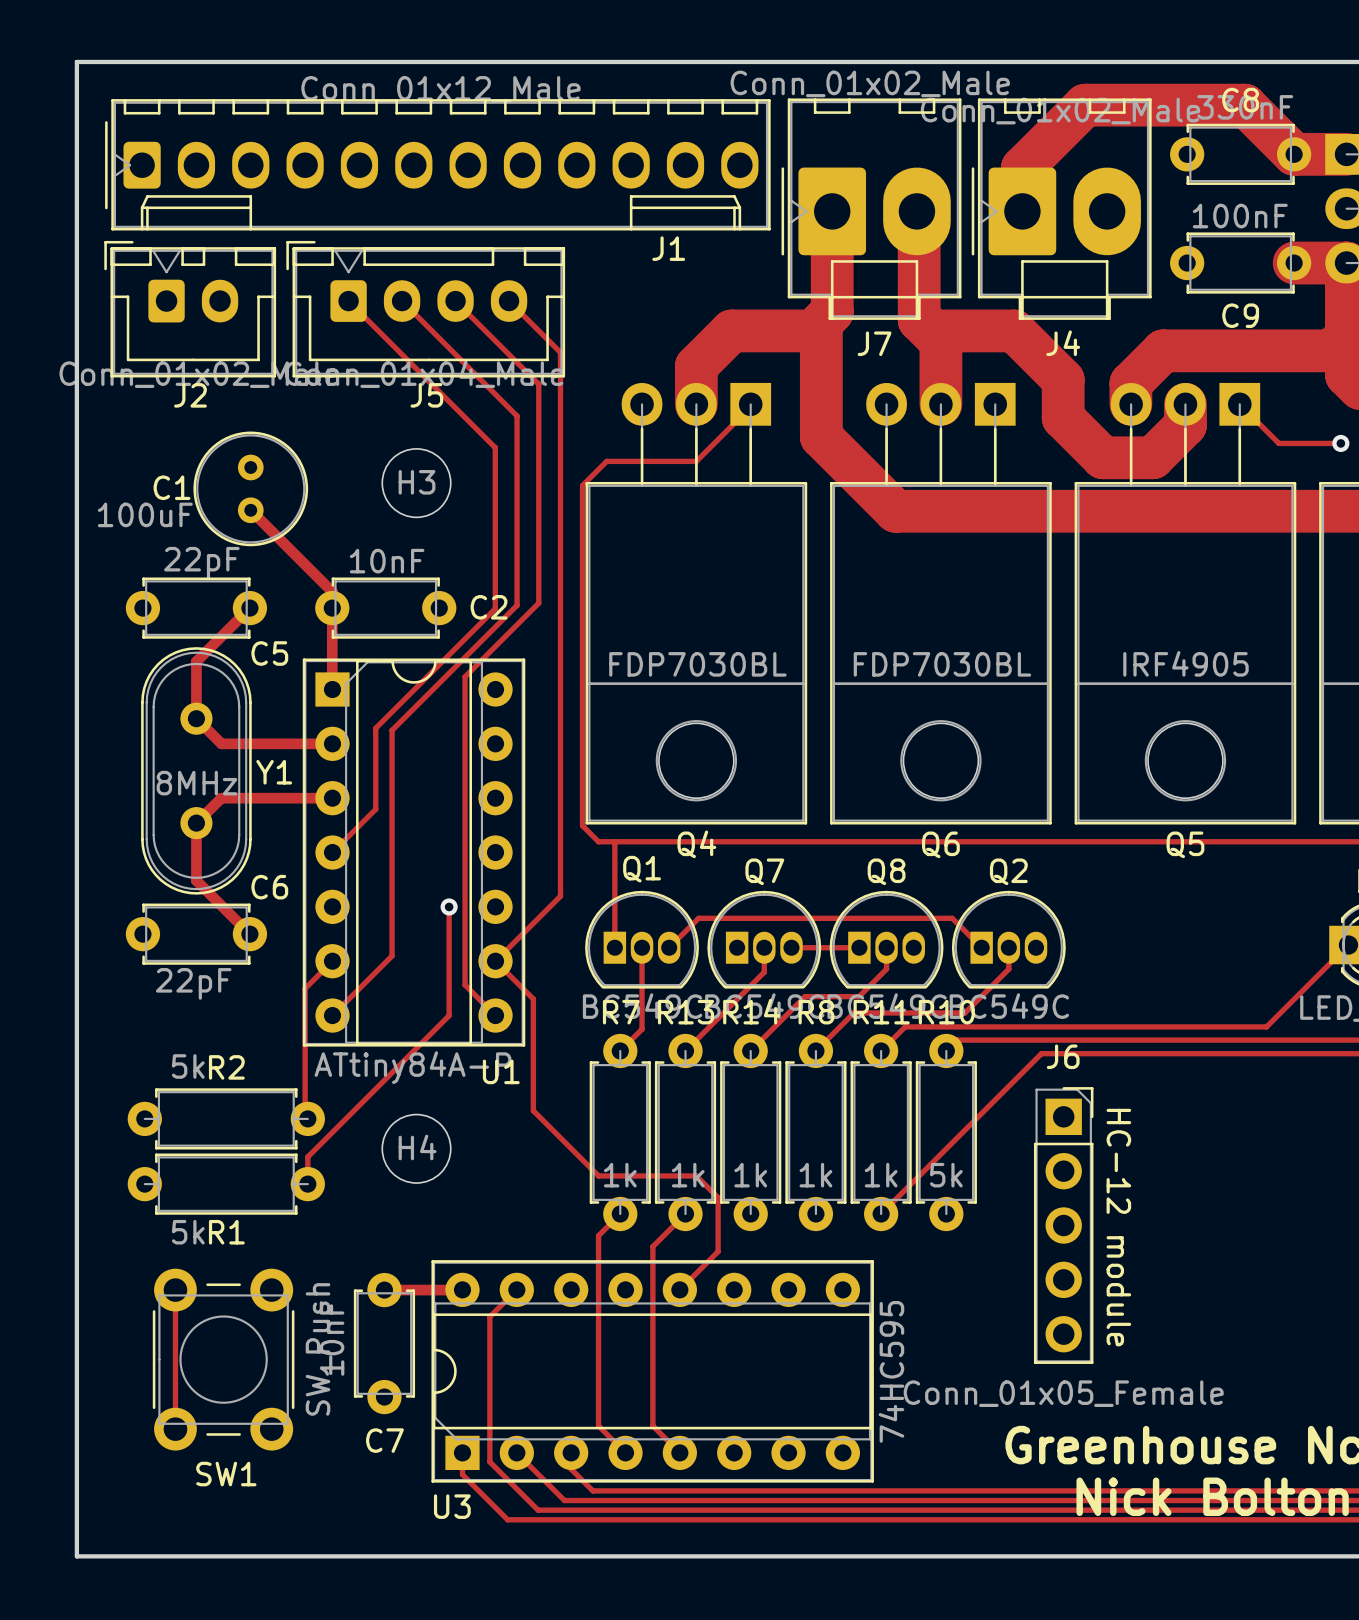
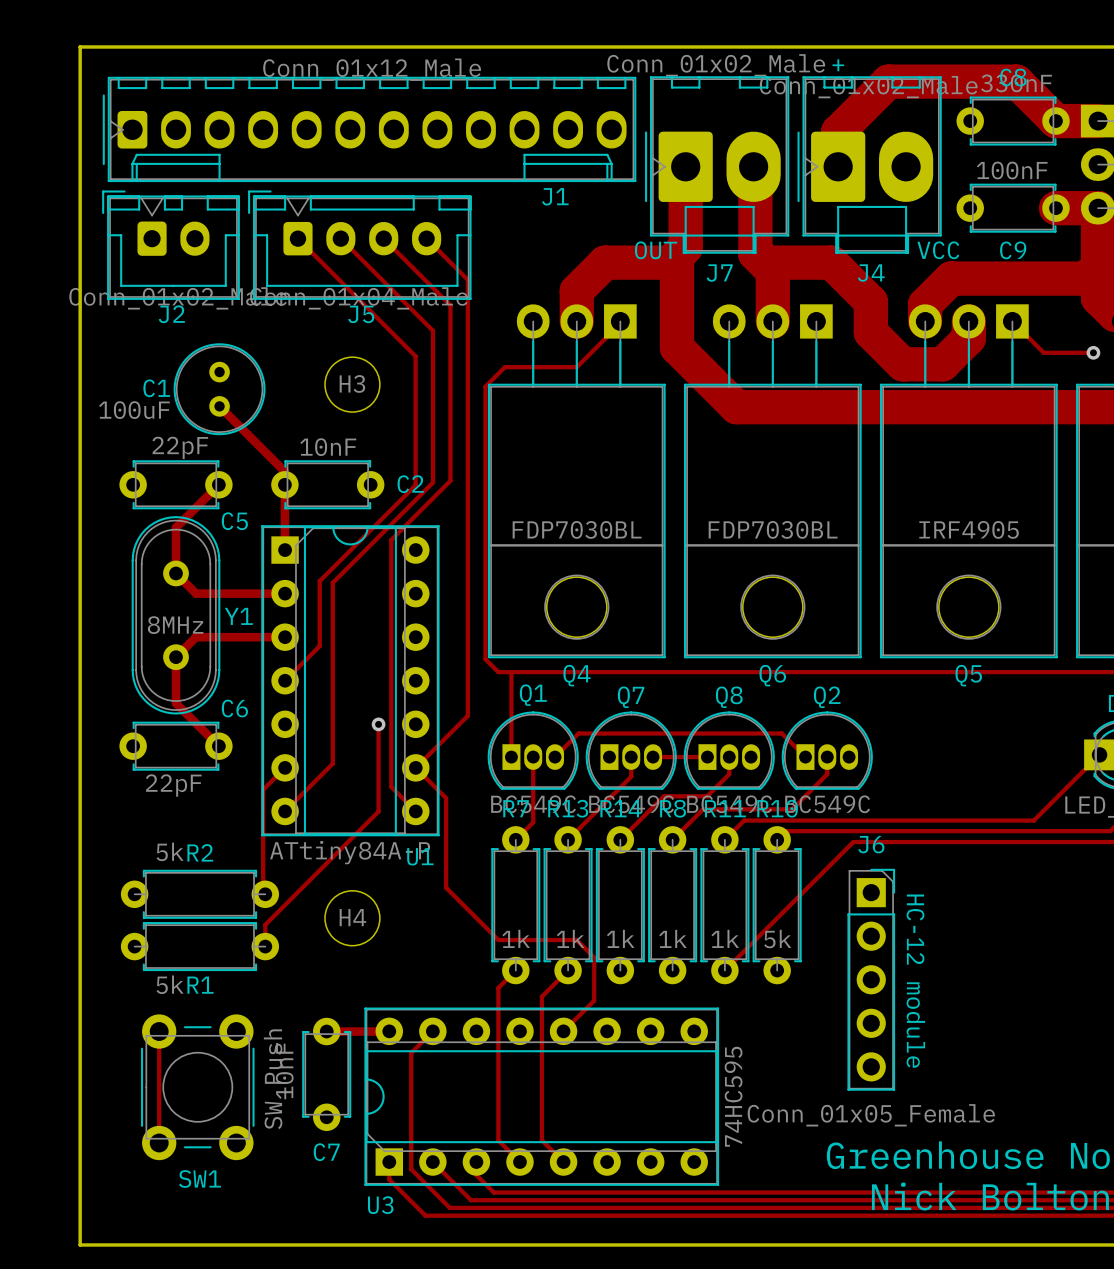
text: none -> + (838, 65)
text: none -> OUT (656, 250)
text: none -> VCC (938, 250)

